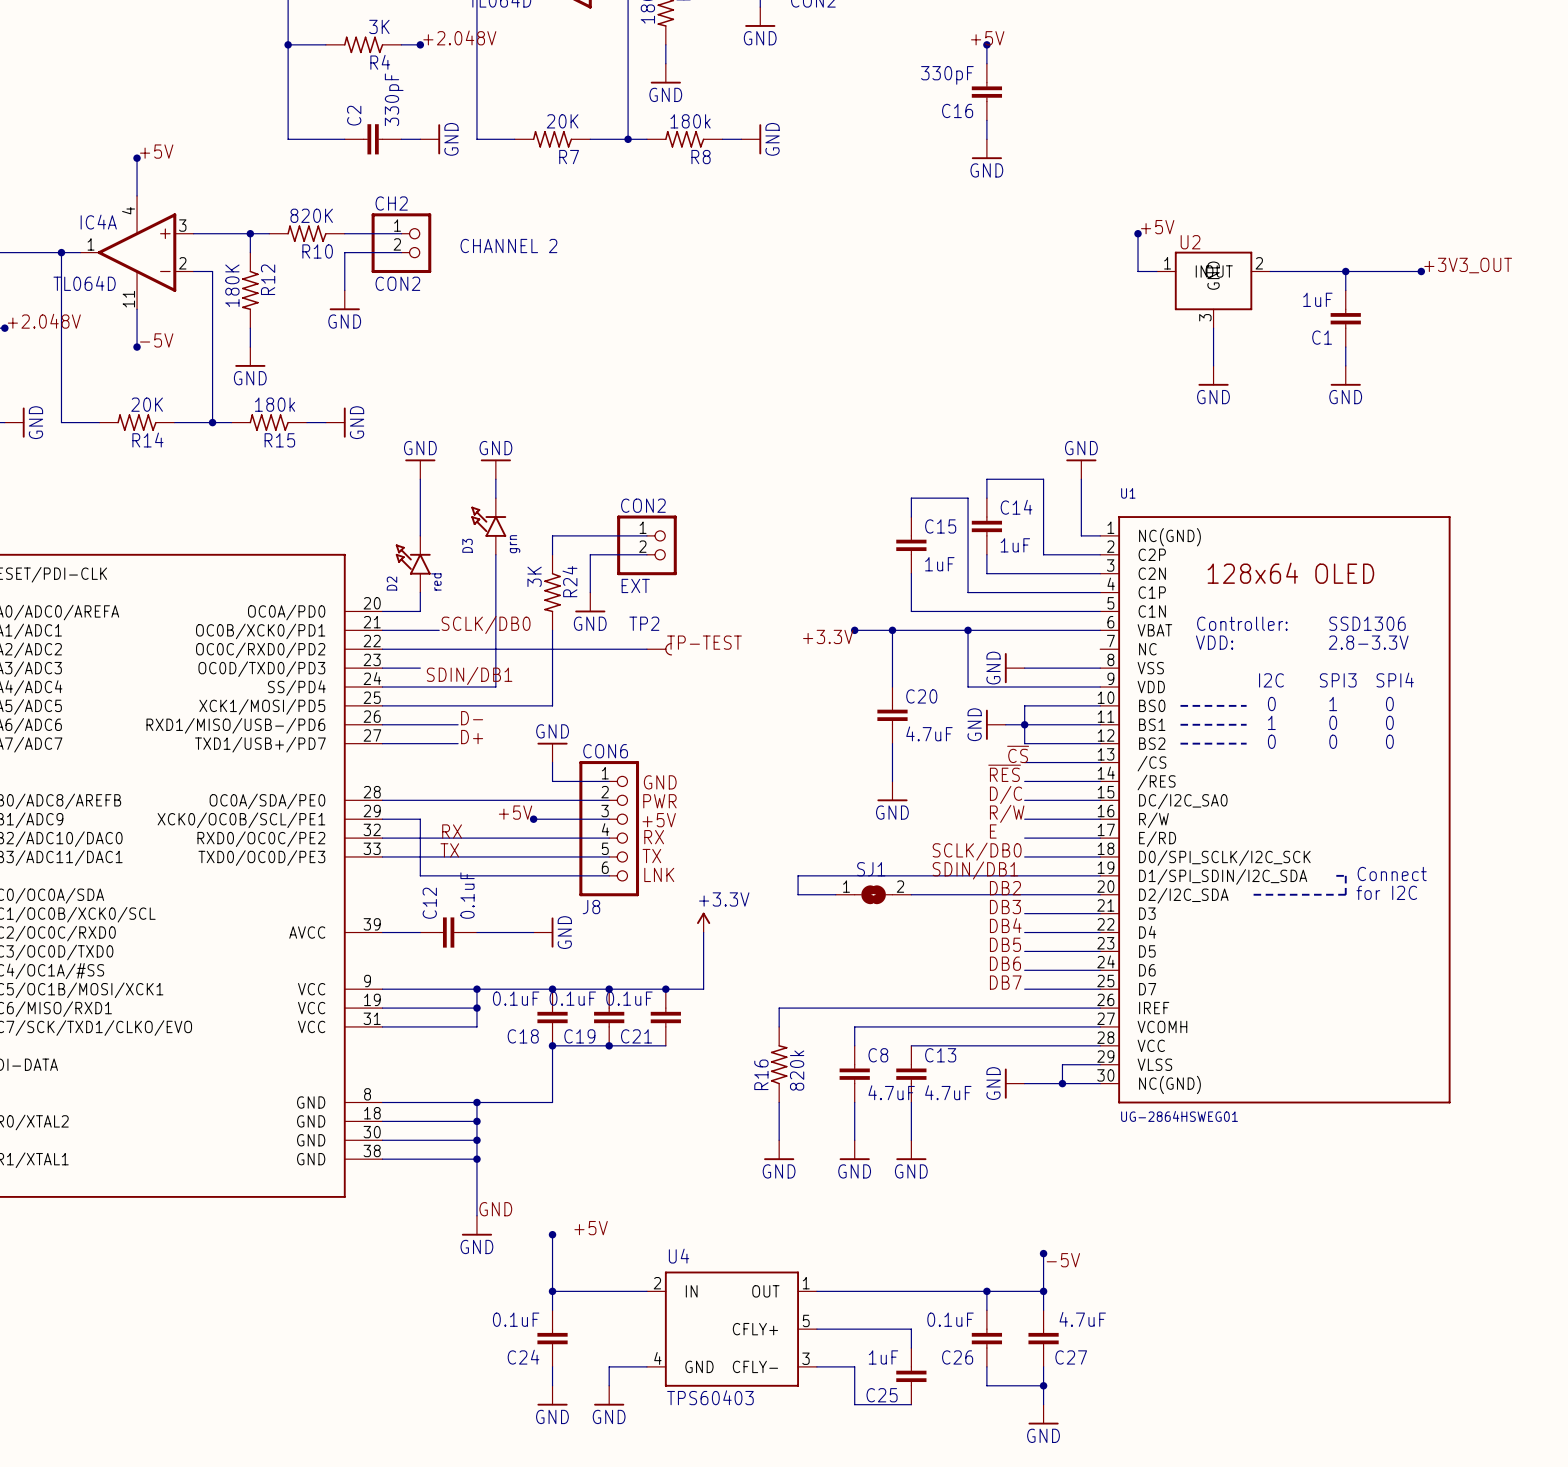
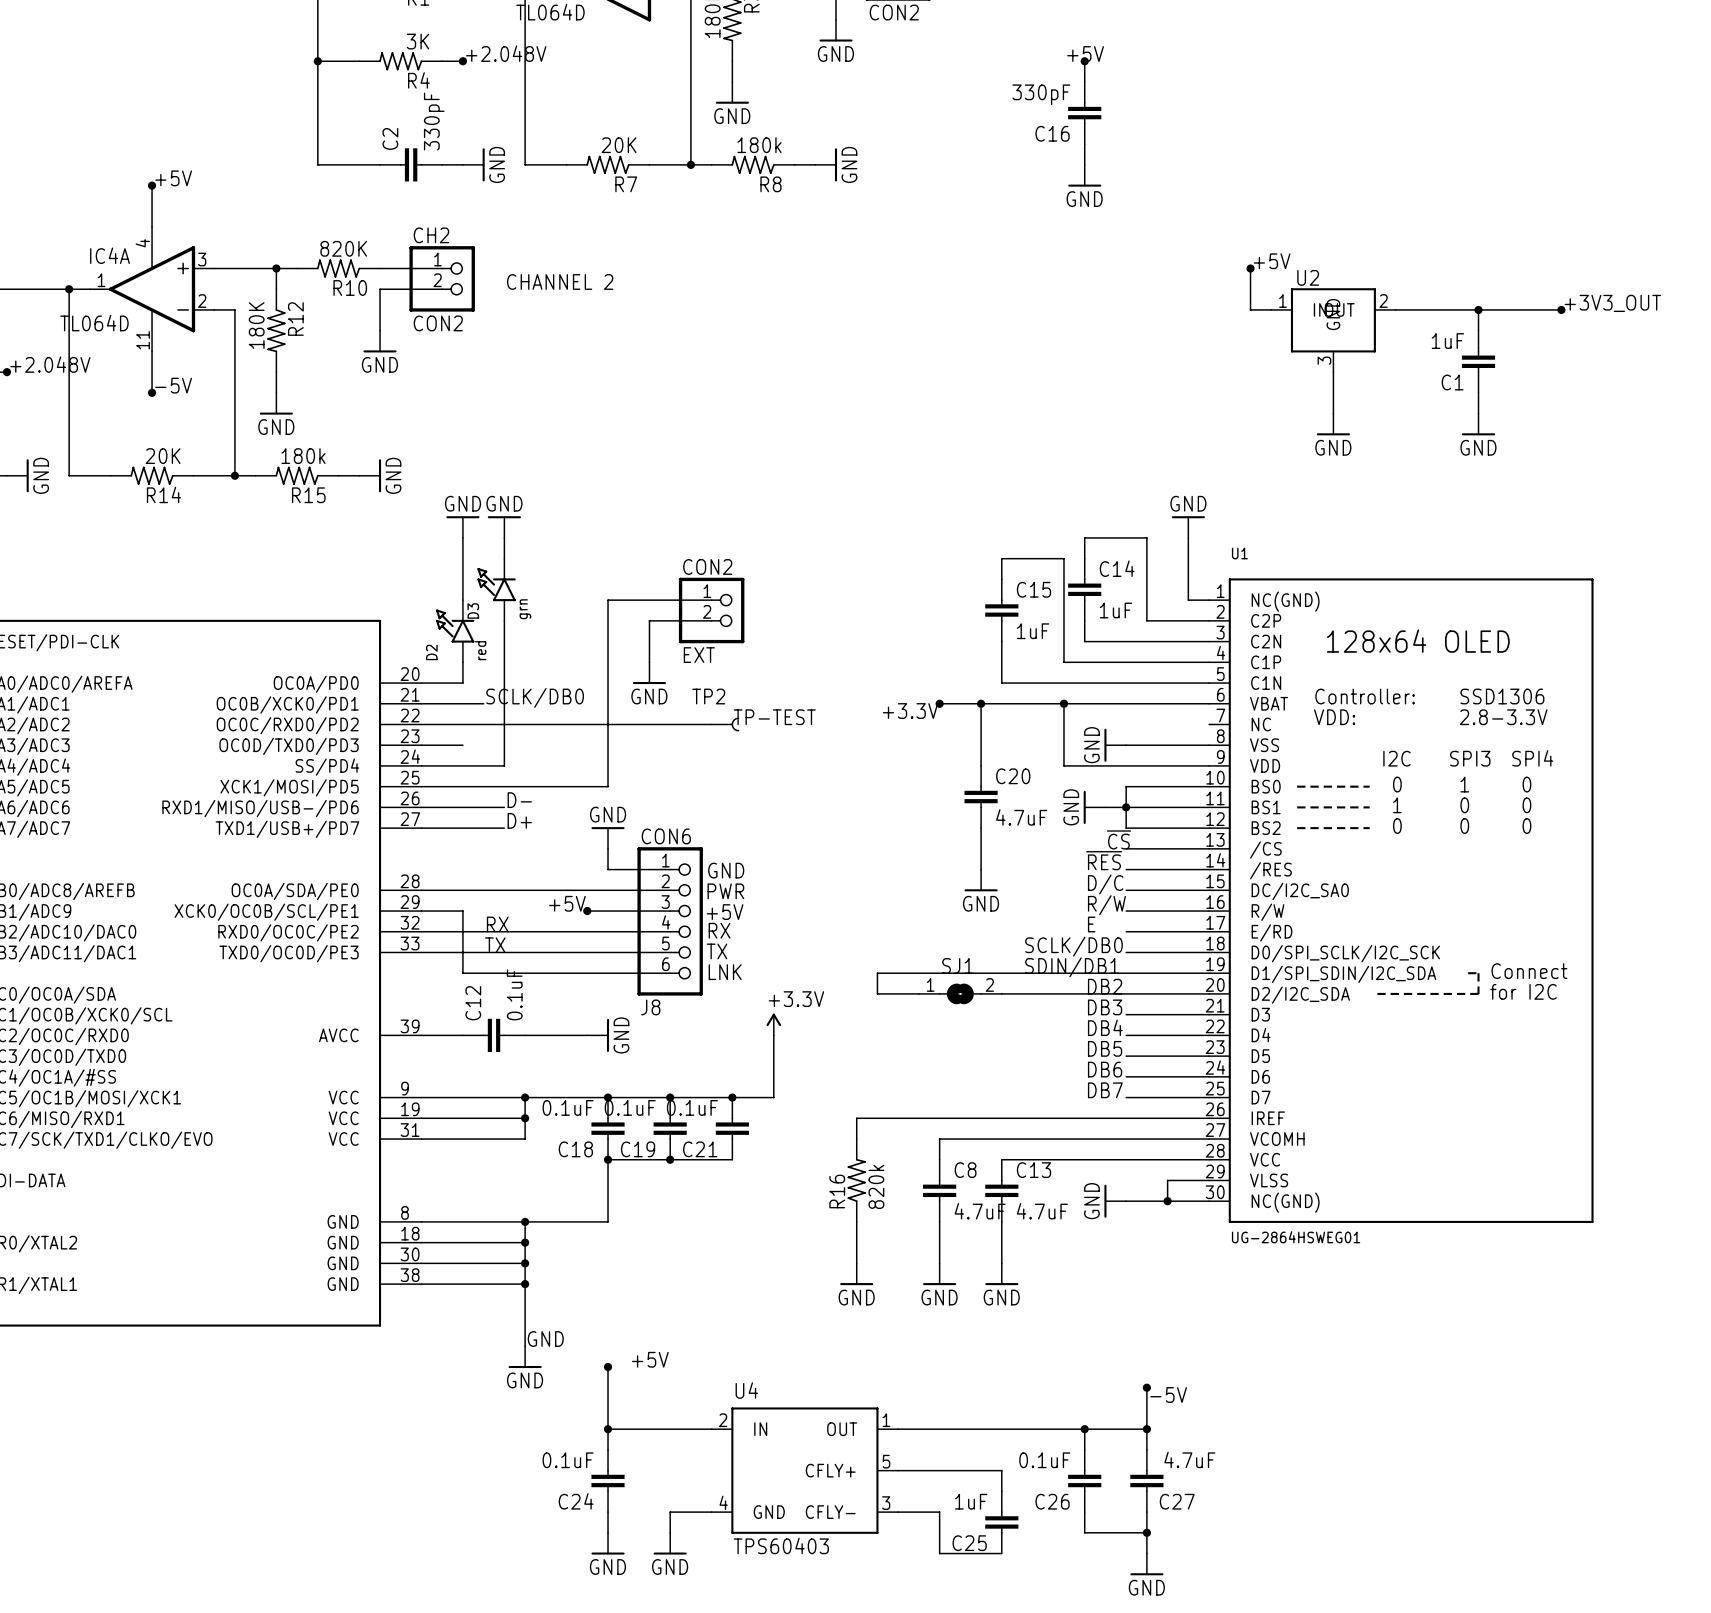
power symbol position: GND (495, 469) -> GND (504, 527)
wire: (495, 479) (495, 498) -> (504, 537) (504, 558)
D3 position: (488, 526) -> (496, 589)
wire: (495, 554) (495, 687) (458, 687) -> (504, 620) (504, 765)
R24: 3K (552, 592) -> none
label: SDIN/DB1 (469, 675) -> none

